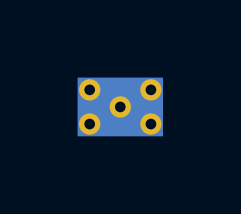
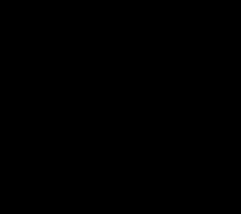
part: (120, 106) -> none

